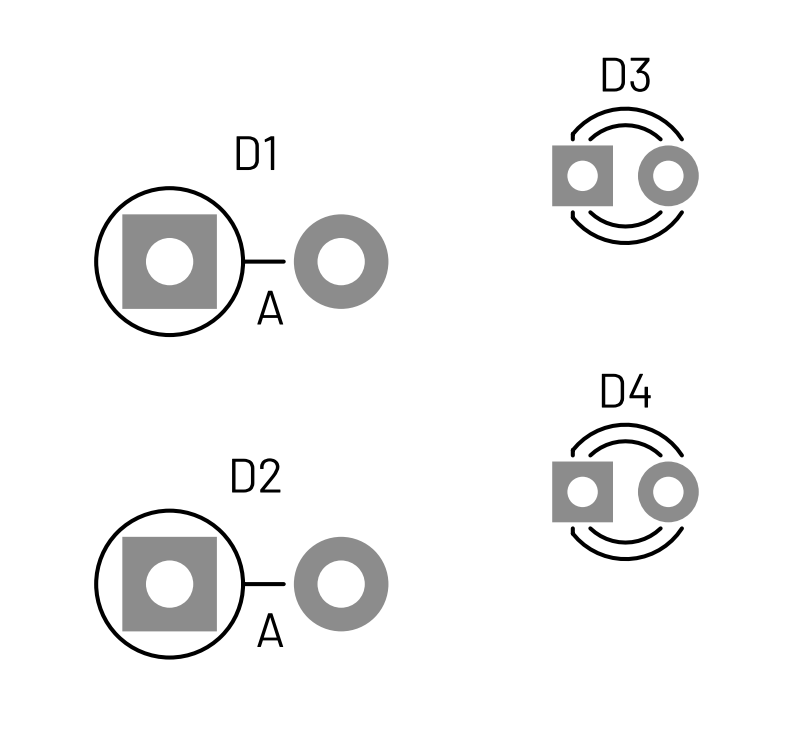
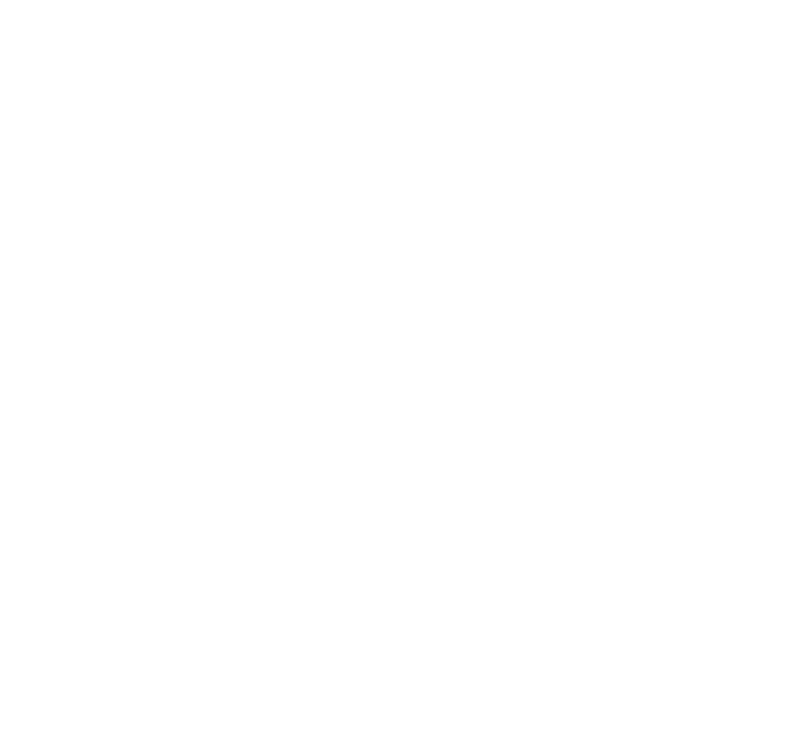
D3: (625, 175) -> none
D1: (241, 261) -> none
D4: (625, 491) -> none
D2: (241, 584) -> none

